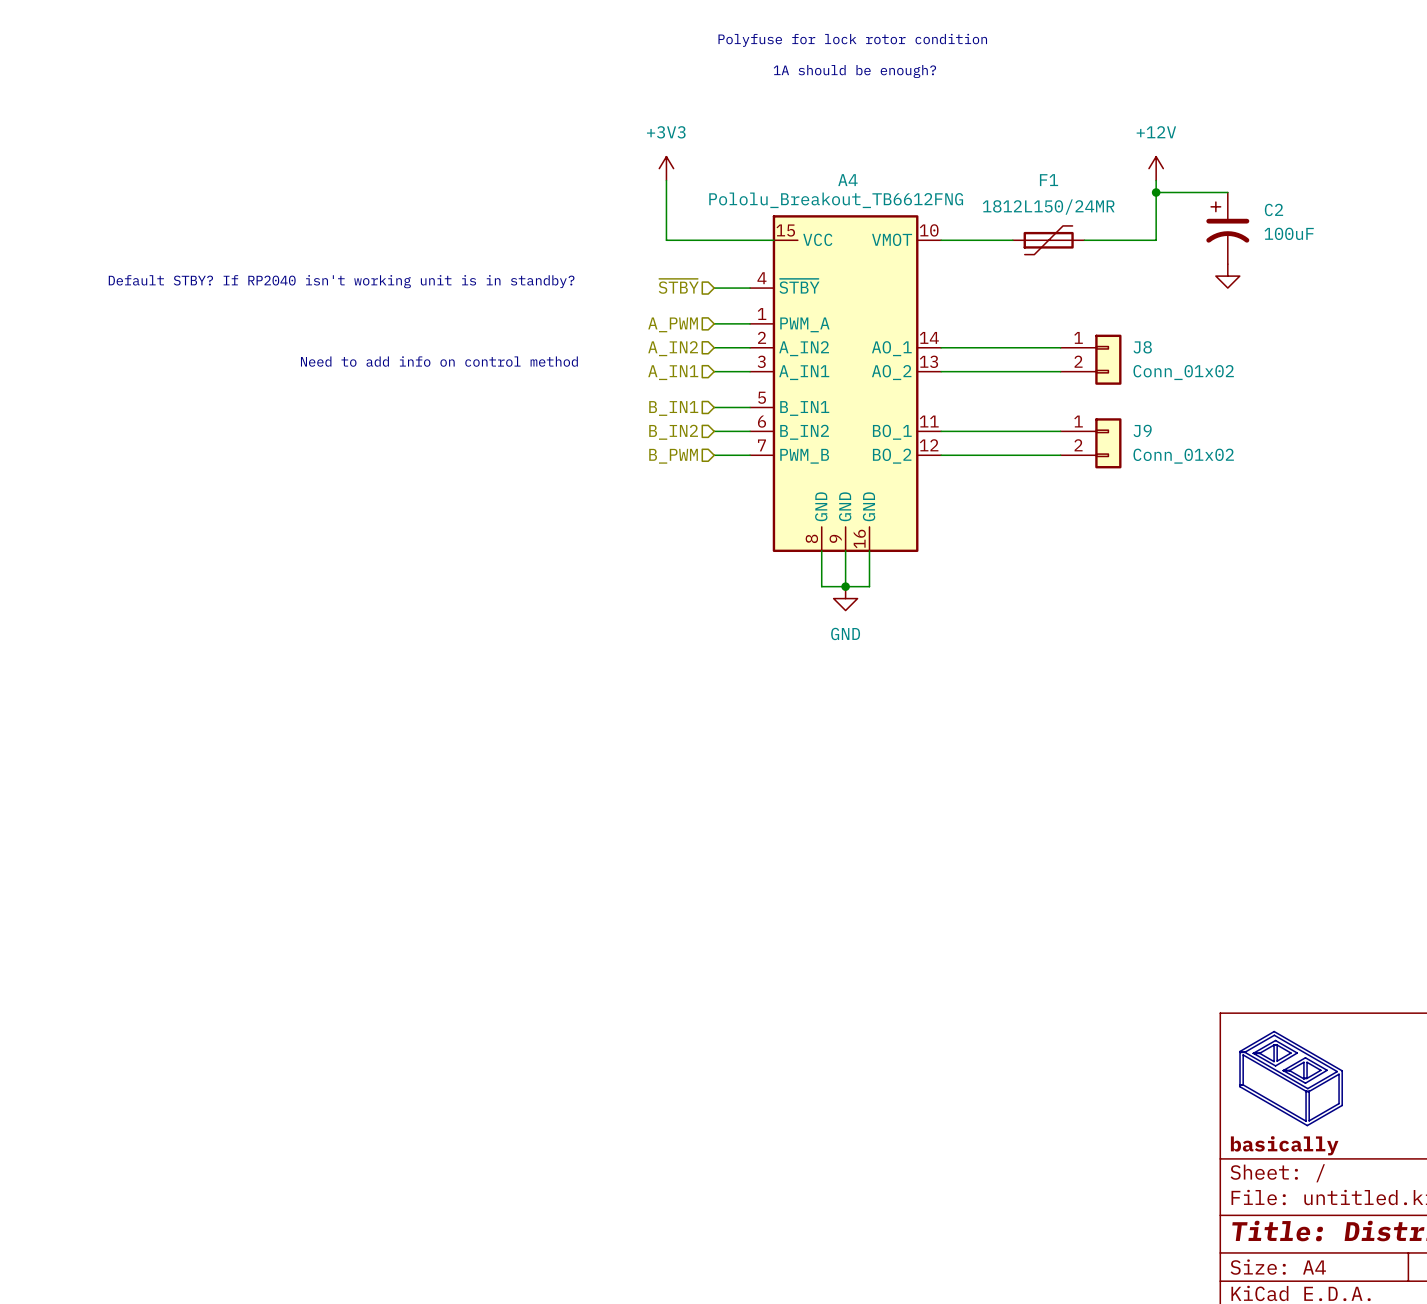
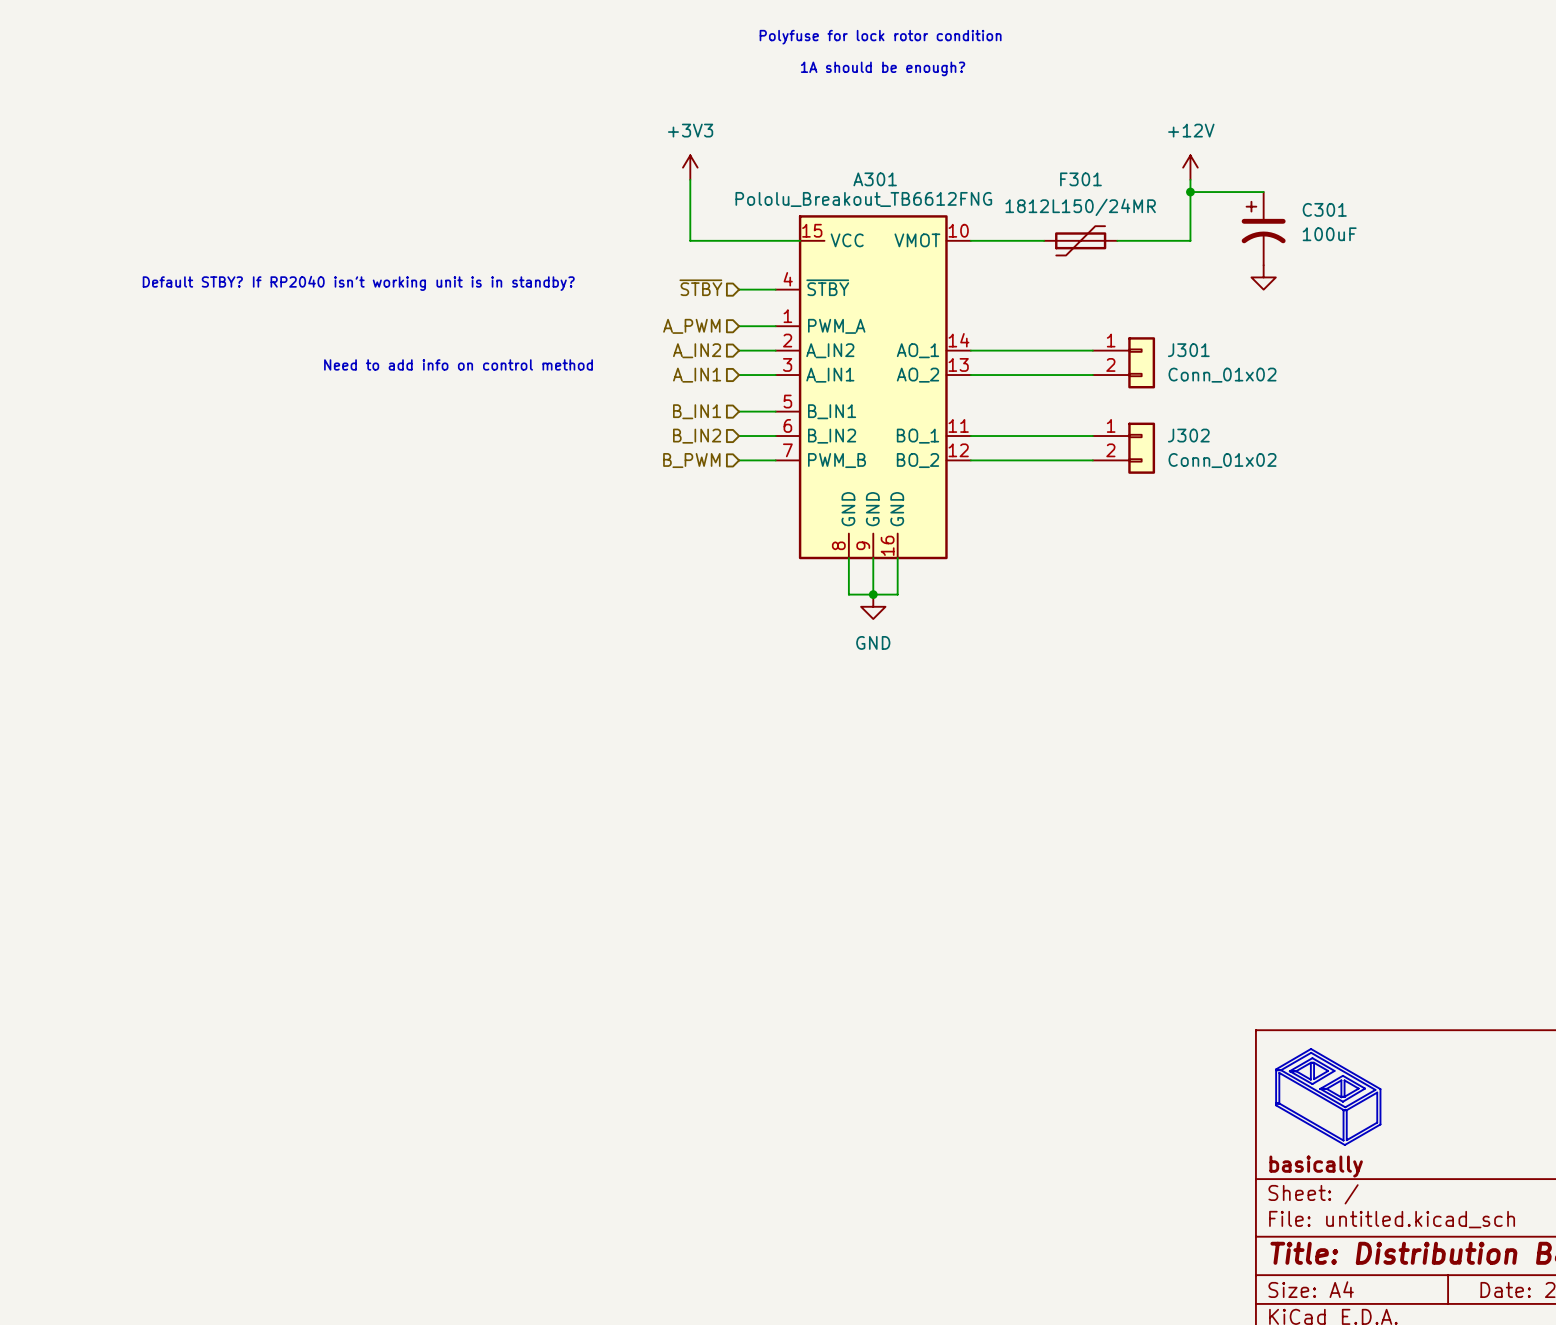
A4 name: A4 (847, 180) -> A301 (875, 179)
F1 name: F1 (1049, 180) -> F301 (1080, 179)
C2 name: C2 (1273, 209) -> C301 (1324, 209)
J8 name: J8 (1142, 347) -> J301 (1188, 350)
J9 name: J9 (1142, 430) -> J302 (1188, 435)

